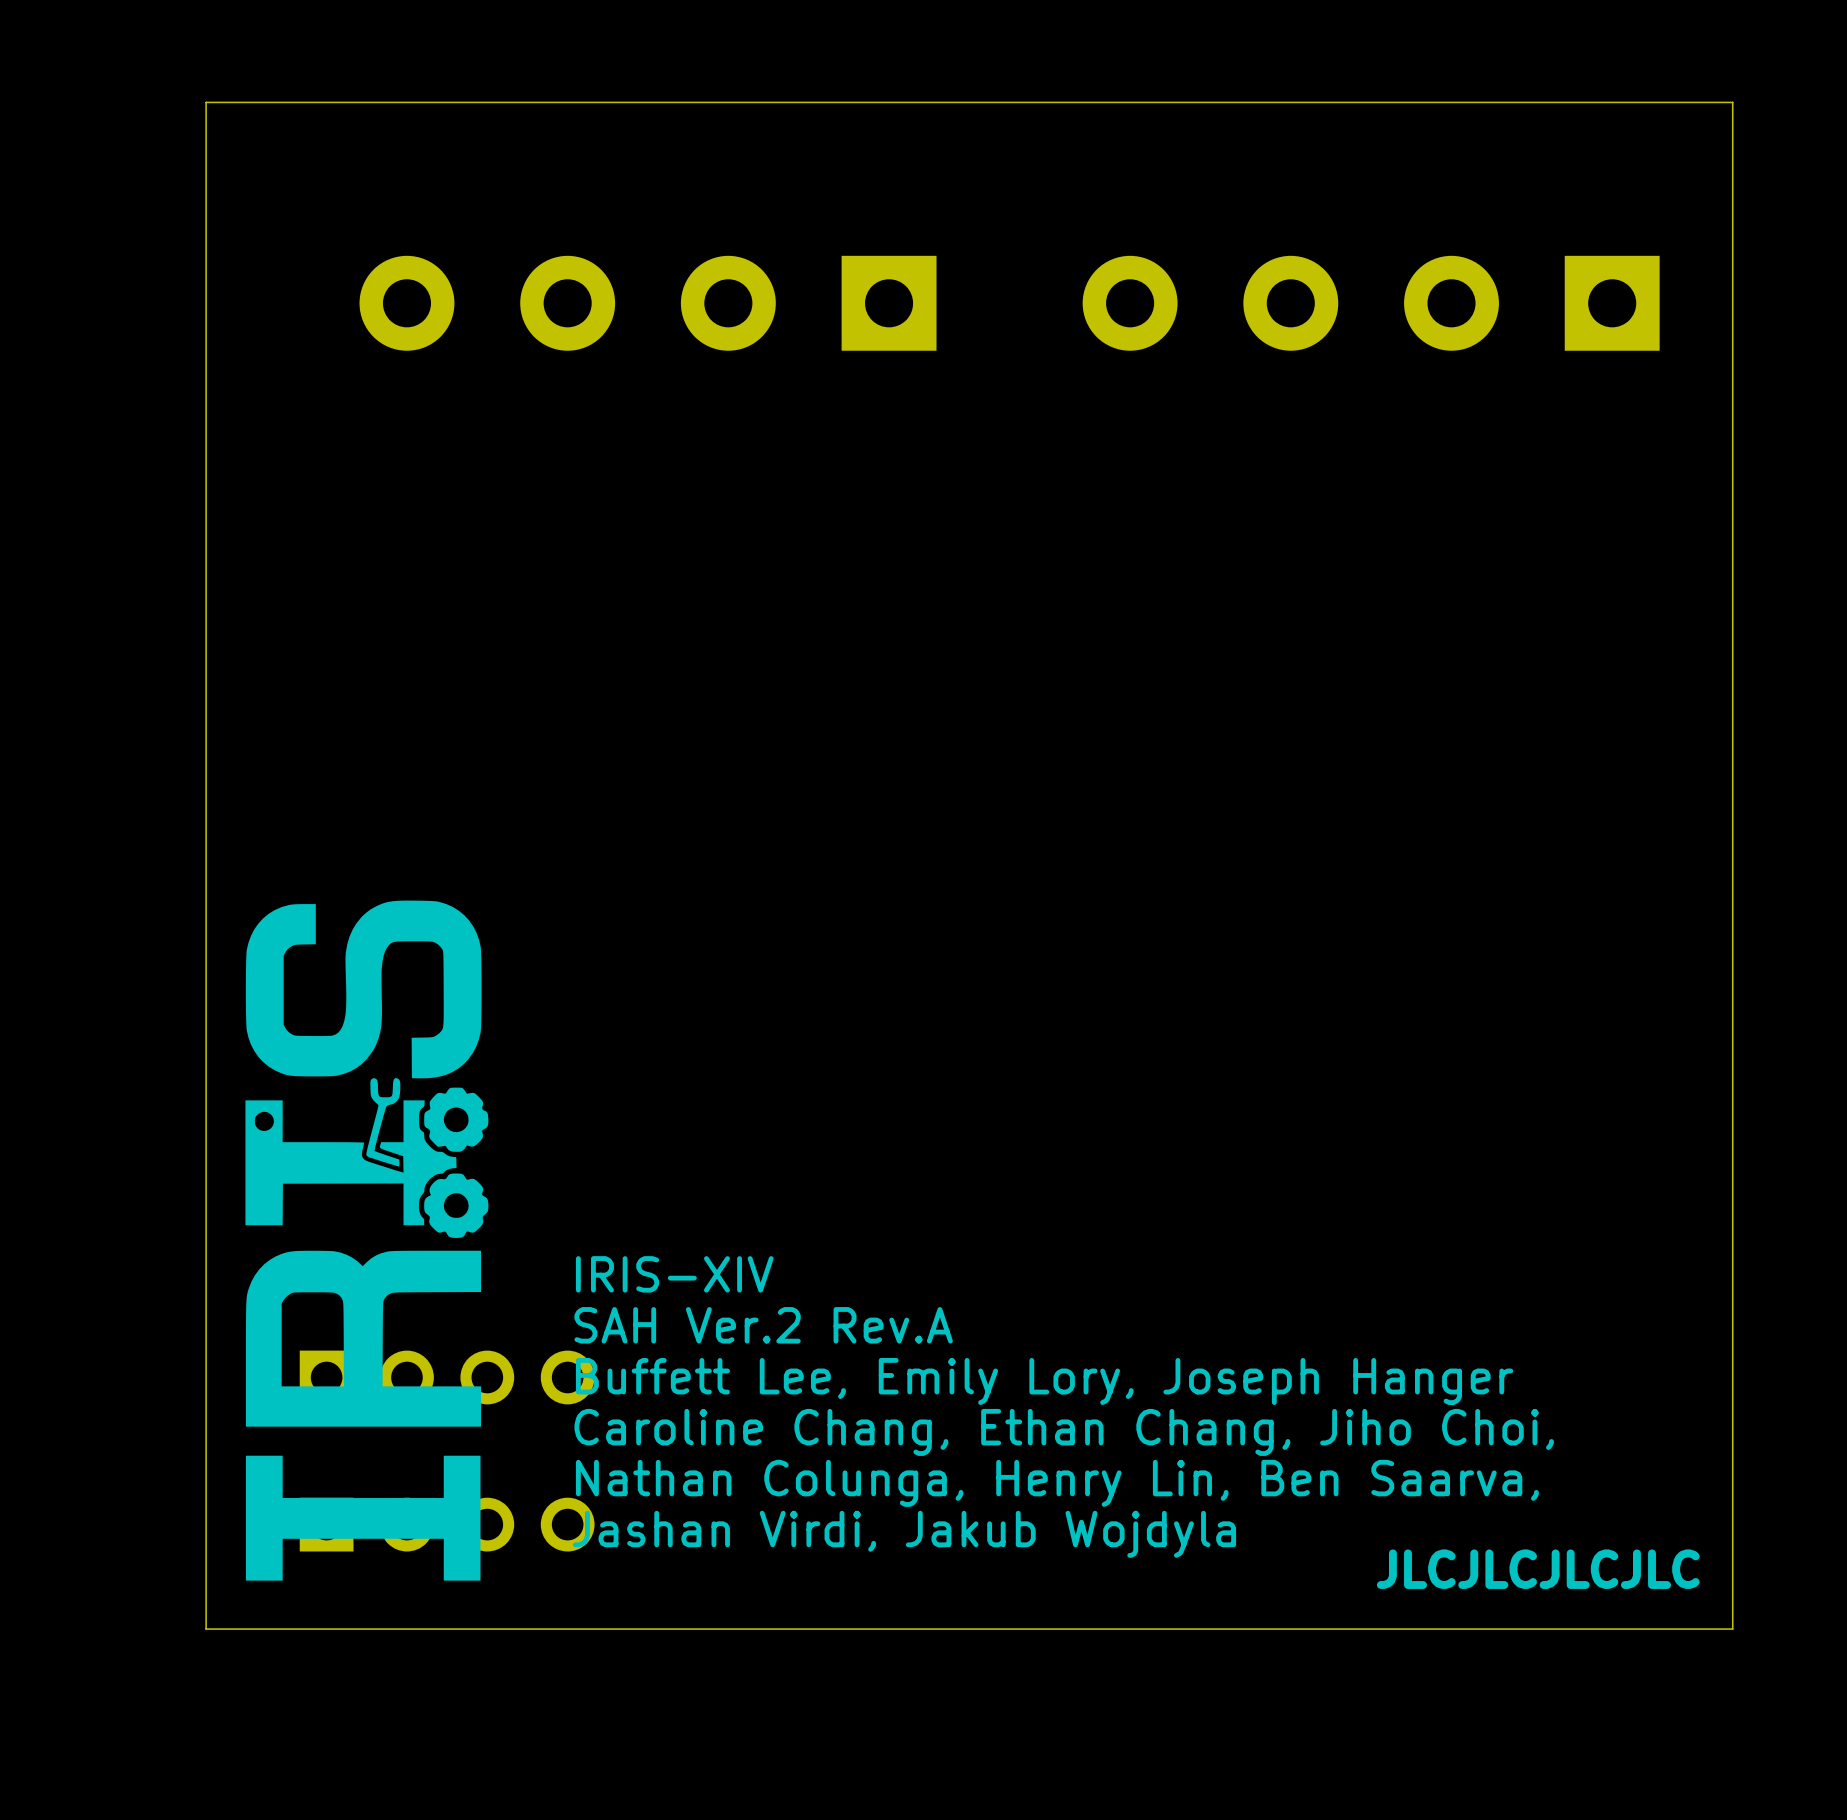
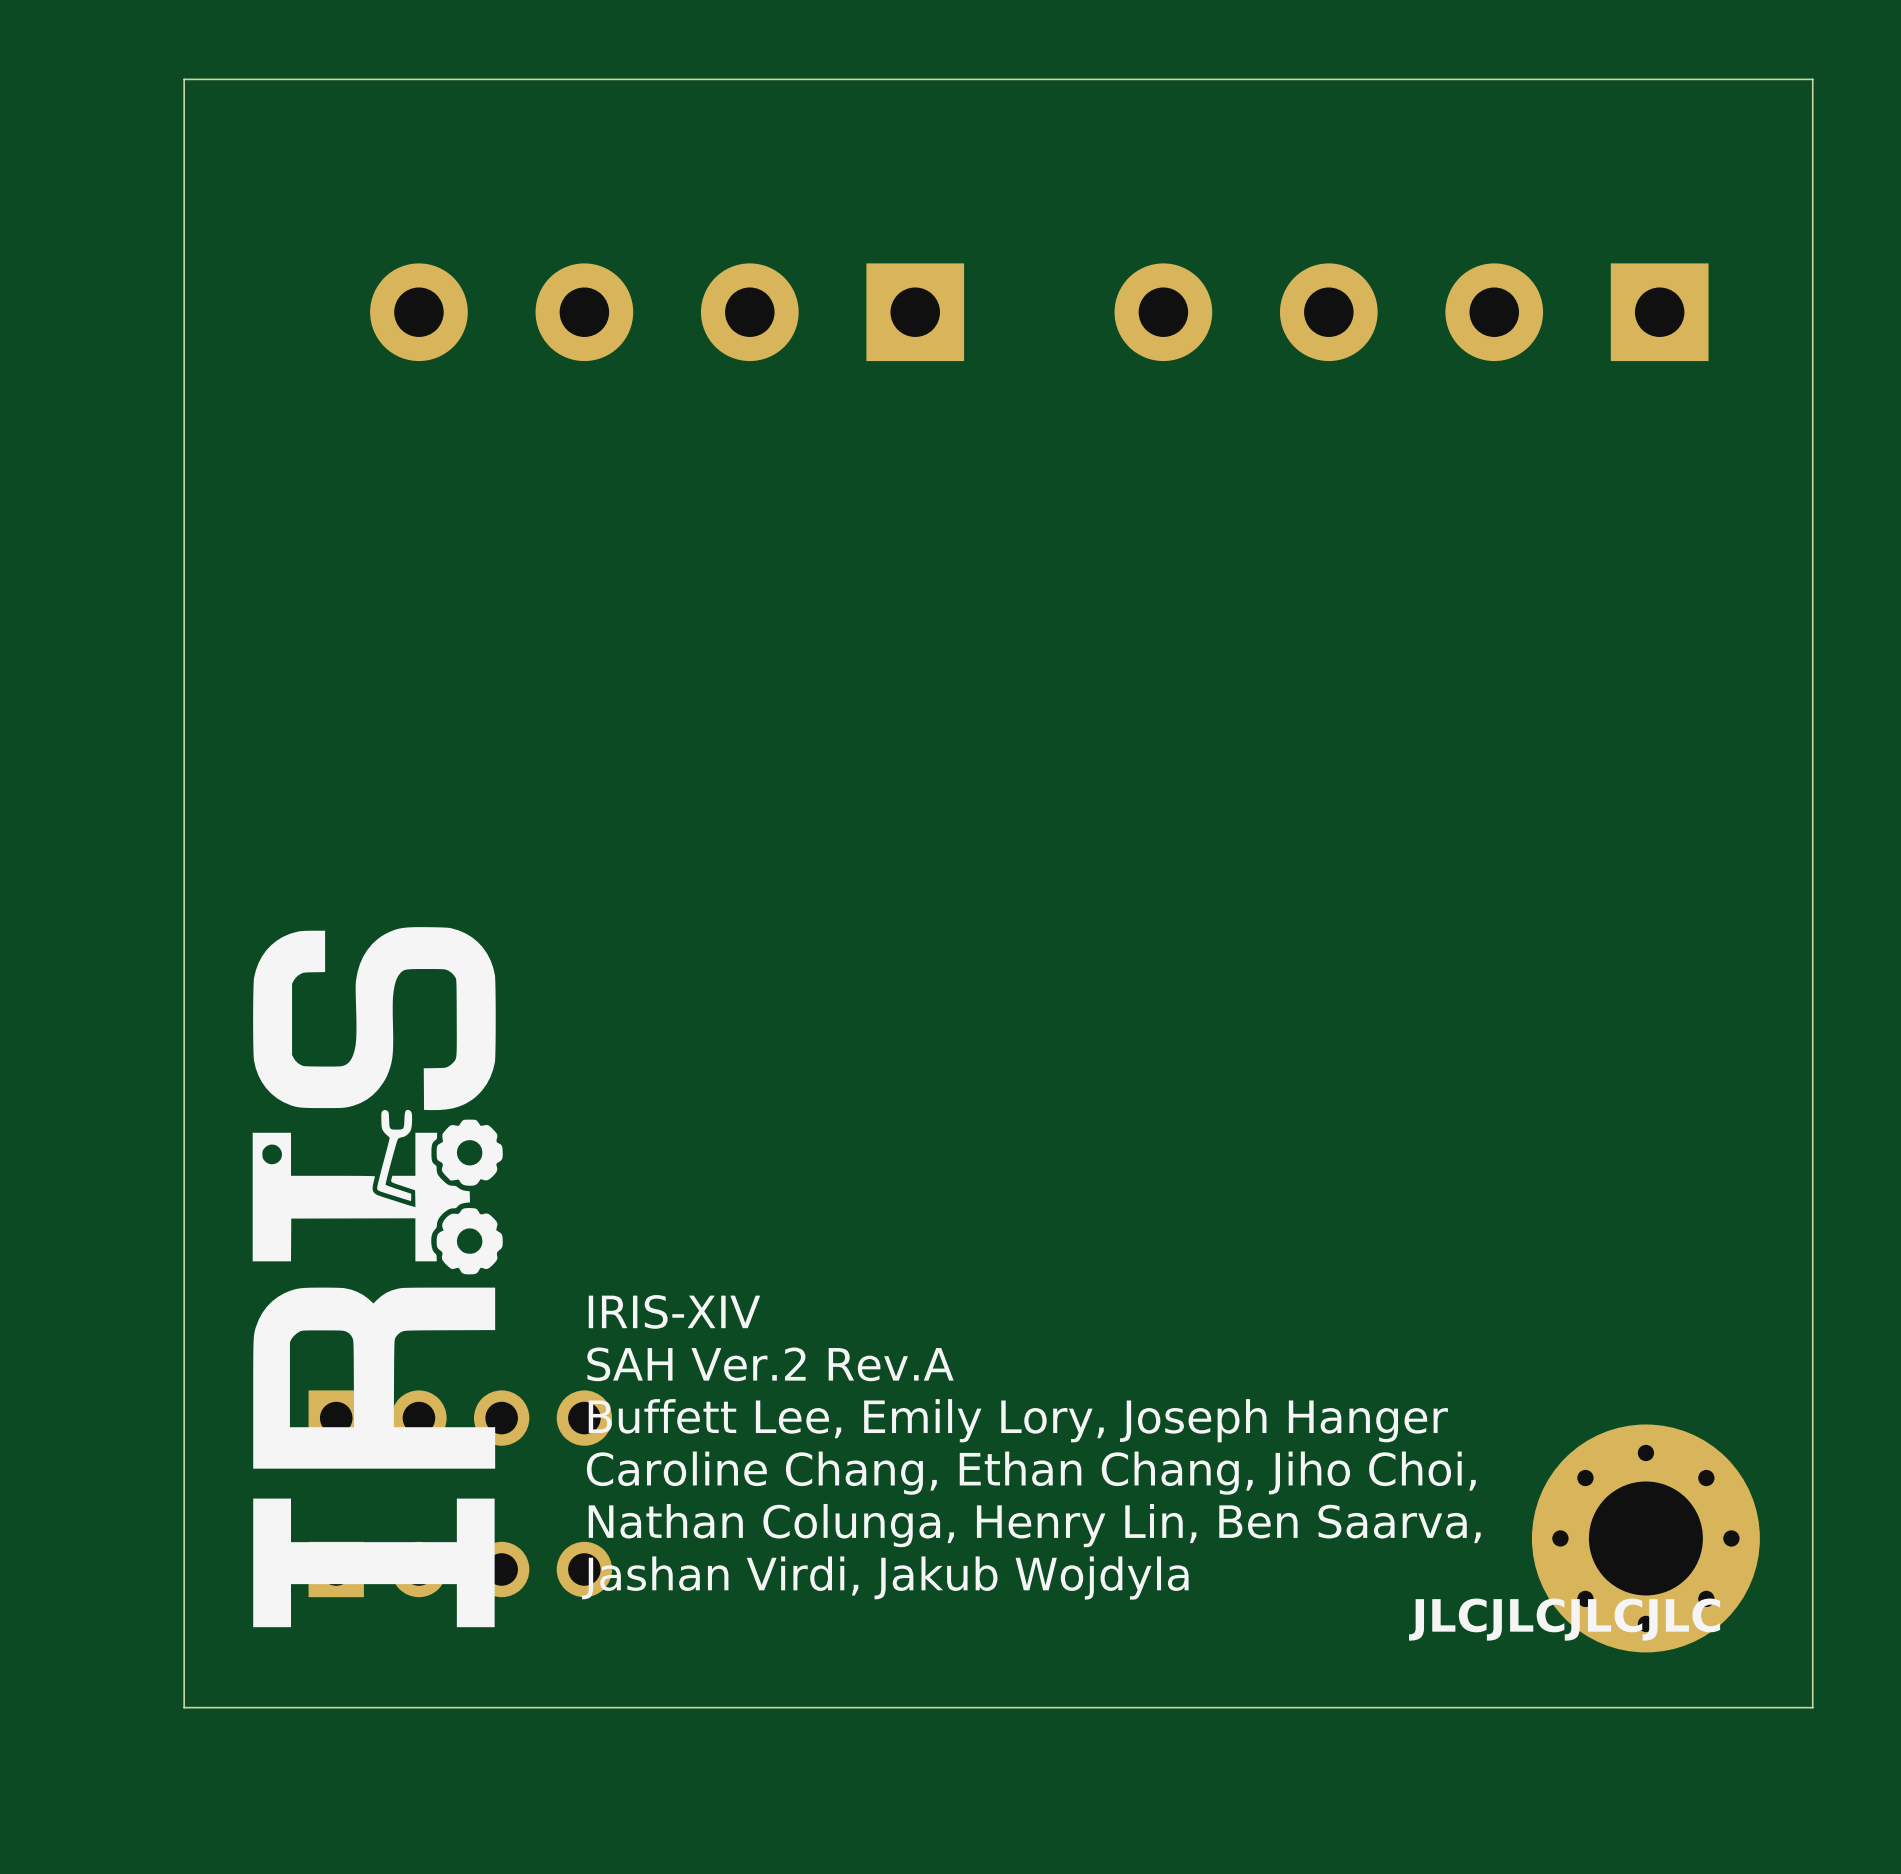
board edge: (1732, 102) (206, 102) (206, 1629) (1732, 1629) (1732, 102) -> (1812, 79) (1812, 1707) (184, 1707) (184, 79) (1812, 79)
part: none -> (1645, 1538)

